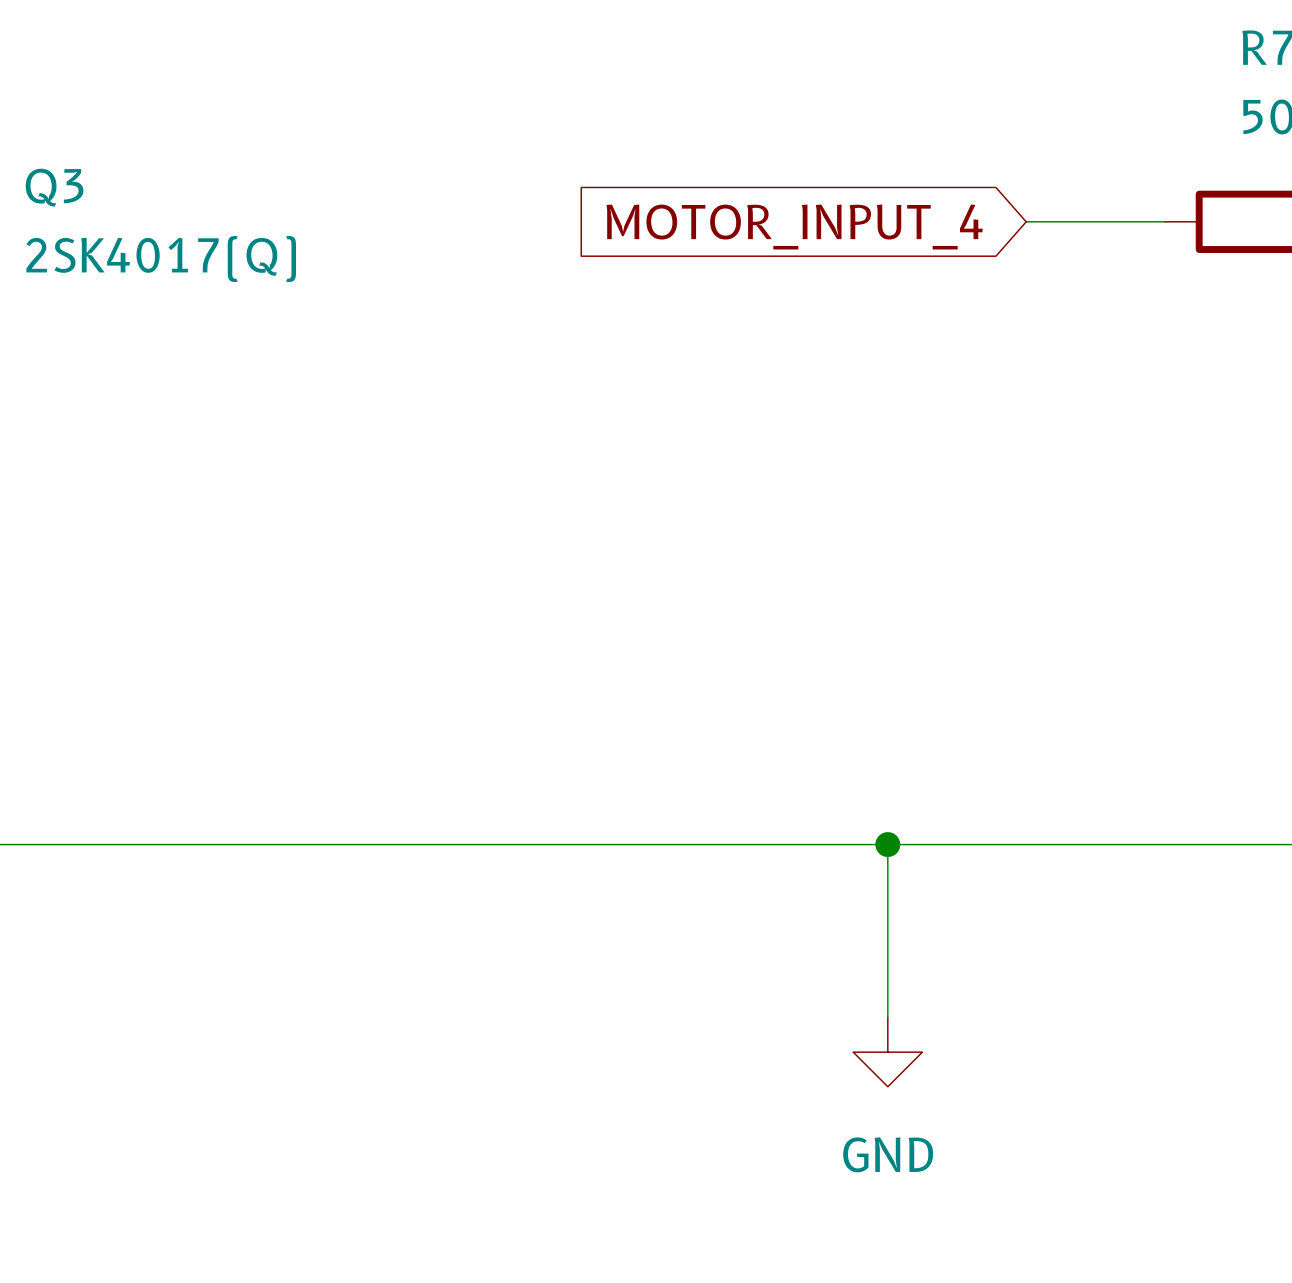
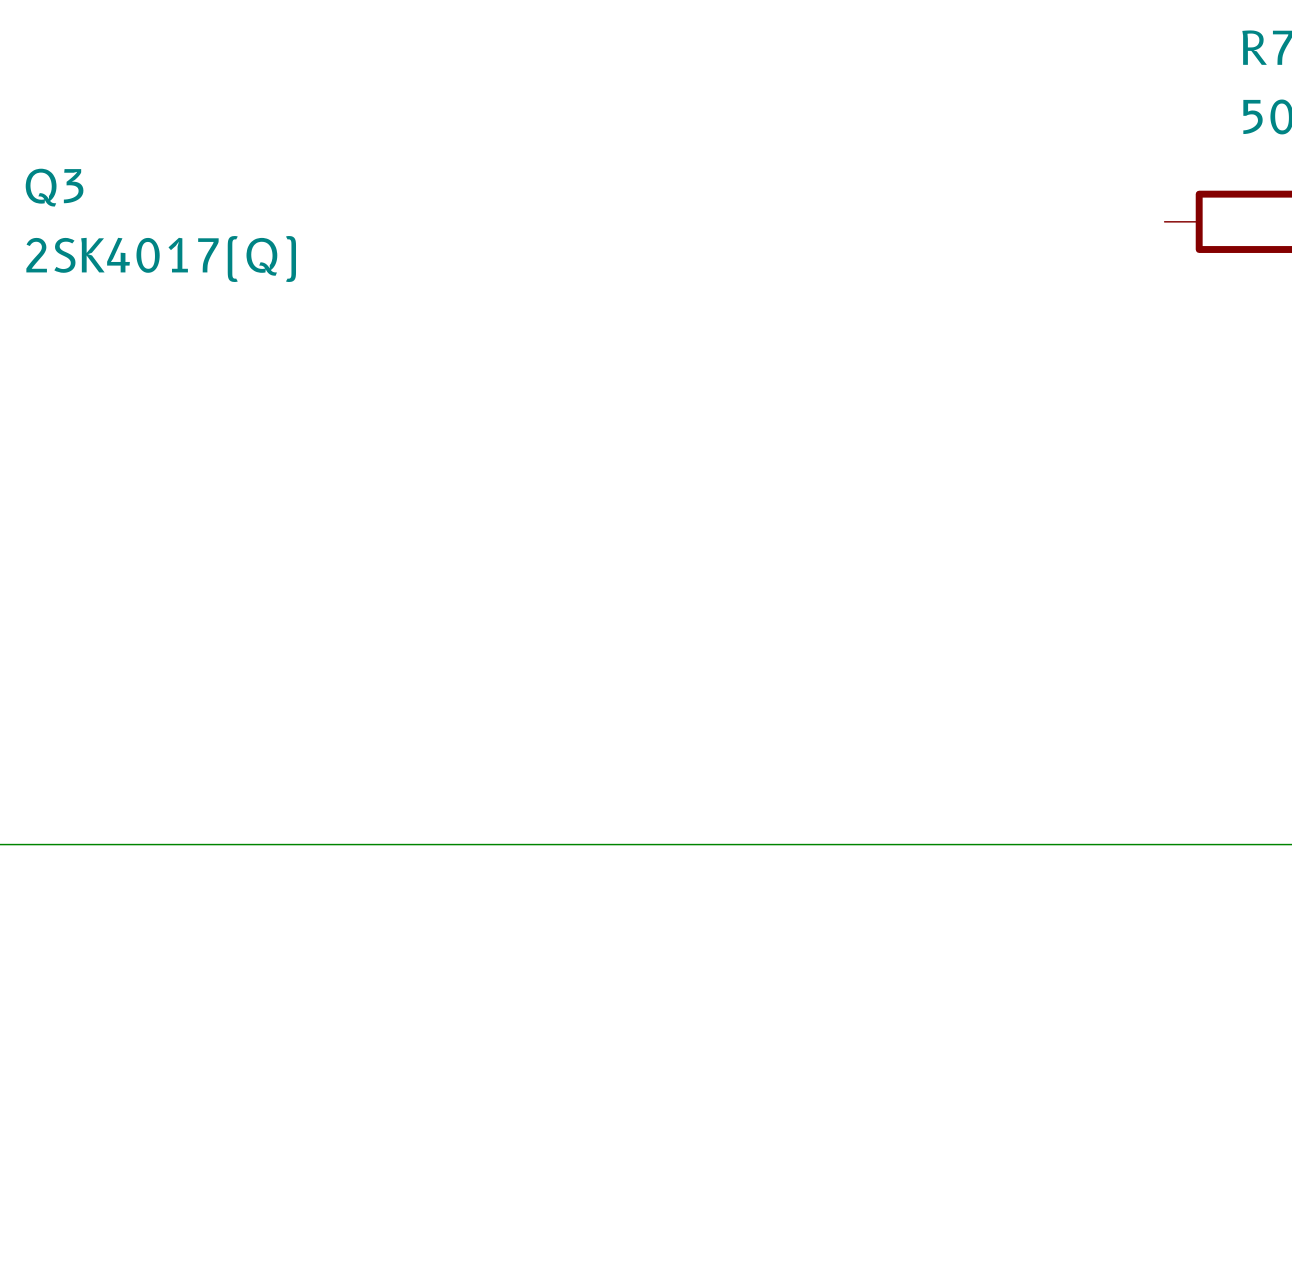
wire: (1026, 221) (1164, 221) -> none
global label: MOTOR_INPUT_4 (794, 227) -> none
wire: (887, 844) (887, 1017) -> none
junction: (887, 844) -> none
power symbol: GND (887, 1052) -> none

